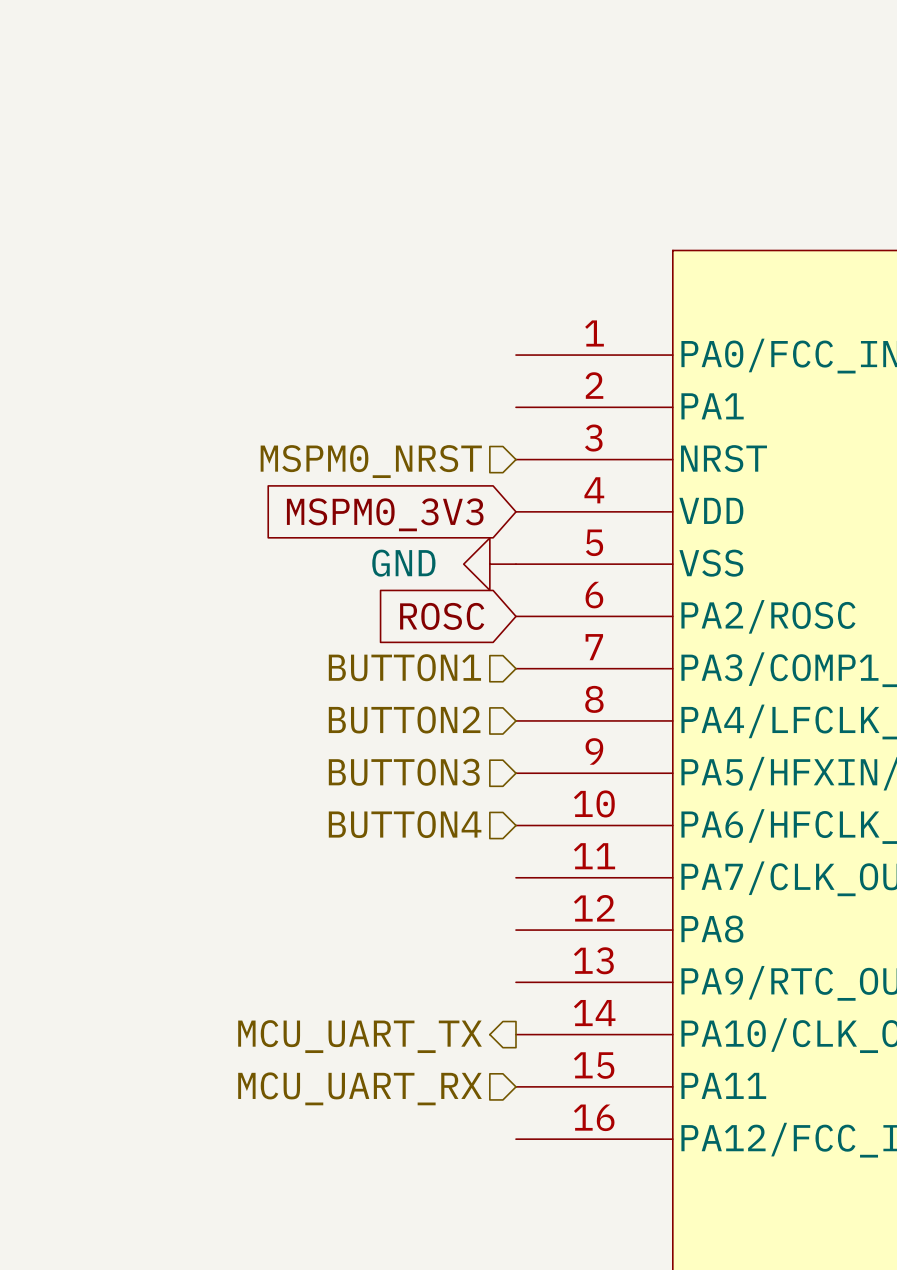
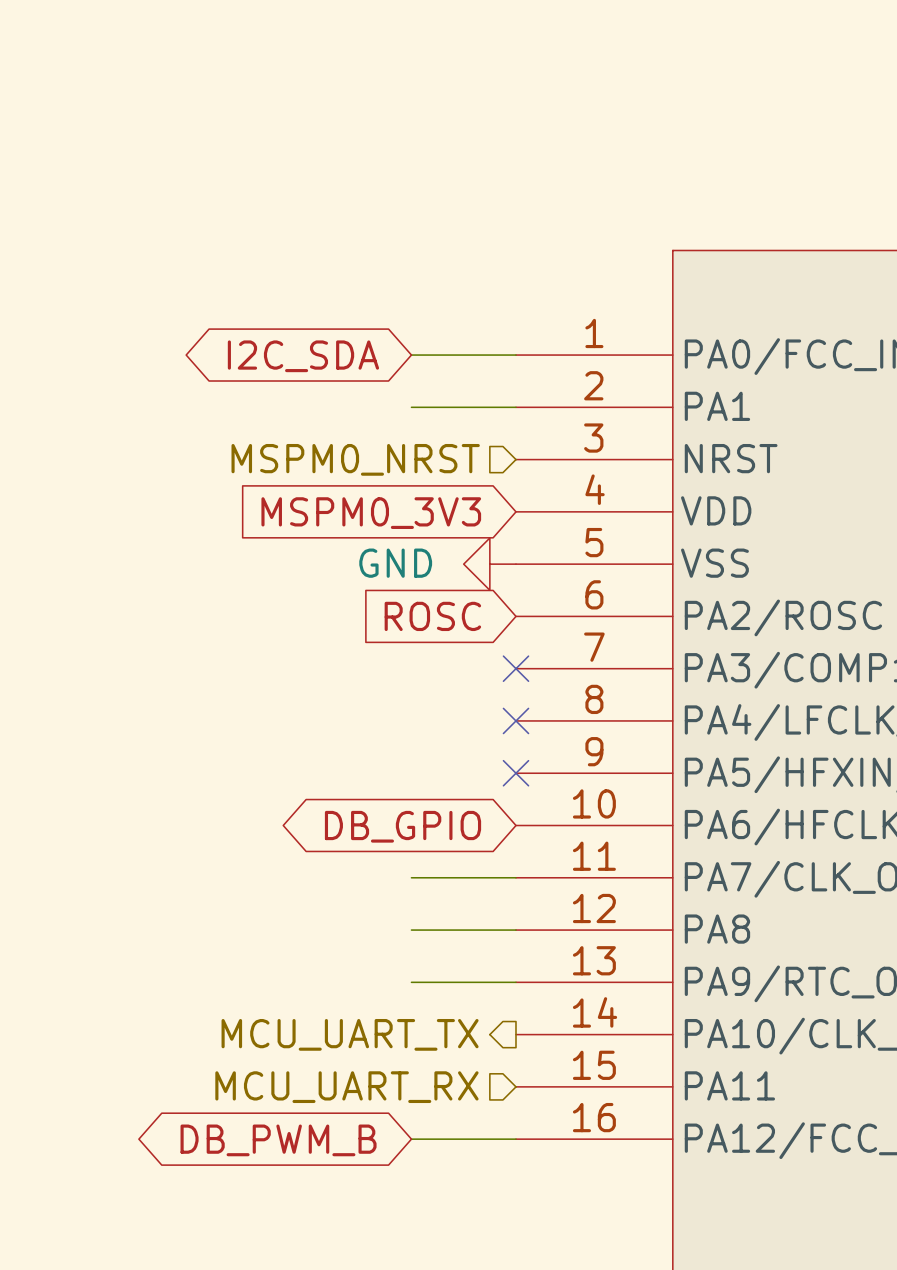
wire: none -> (411, 355) (515, 355)
global label: none -> I2C_SDA (303, 356)
wire: none -> (411, 407) (515, 407)
hierarchical label: BUTTON1 (404, 667) -> none
no-connect mark: none -> (515, 668)
hierarchical label: BUTTON2 (404, 719) -> none
no-connect mark: none -> (515, 720)
hierarchical label: BUTTON3 (404, 772) -> none
no-connect mark: none -> (515, 773)
hierarchical label: BUTTON4 (405, 824) -> none
global label: none -> DB_GPIO (403, 826)
wire: none -> (411, 877) (515, 877)
wire: none -> (411, 930) (515, 930)
wire: none -> (411, 982) (515, 982)
wire: none -> (411, 1139) (515, 1139)
global label: none -> DB_PWM_B (278, 1140)

